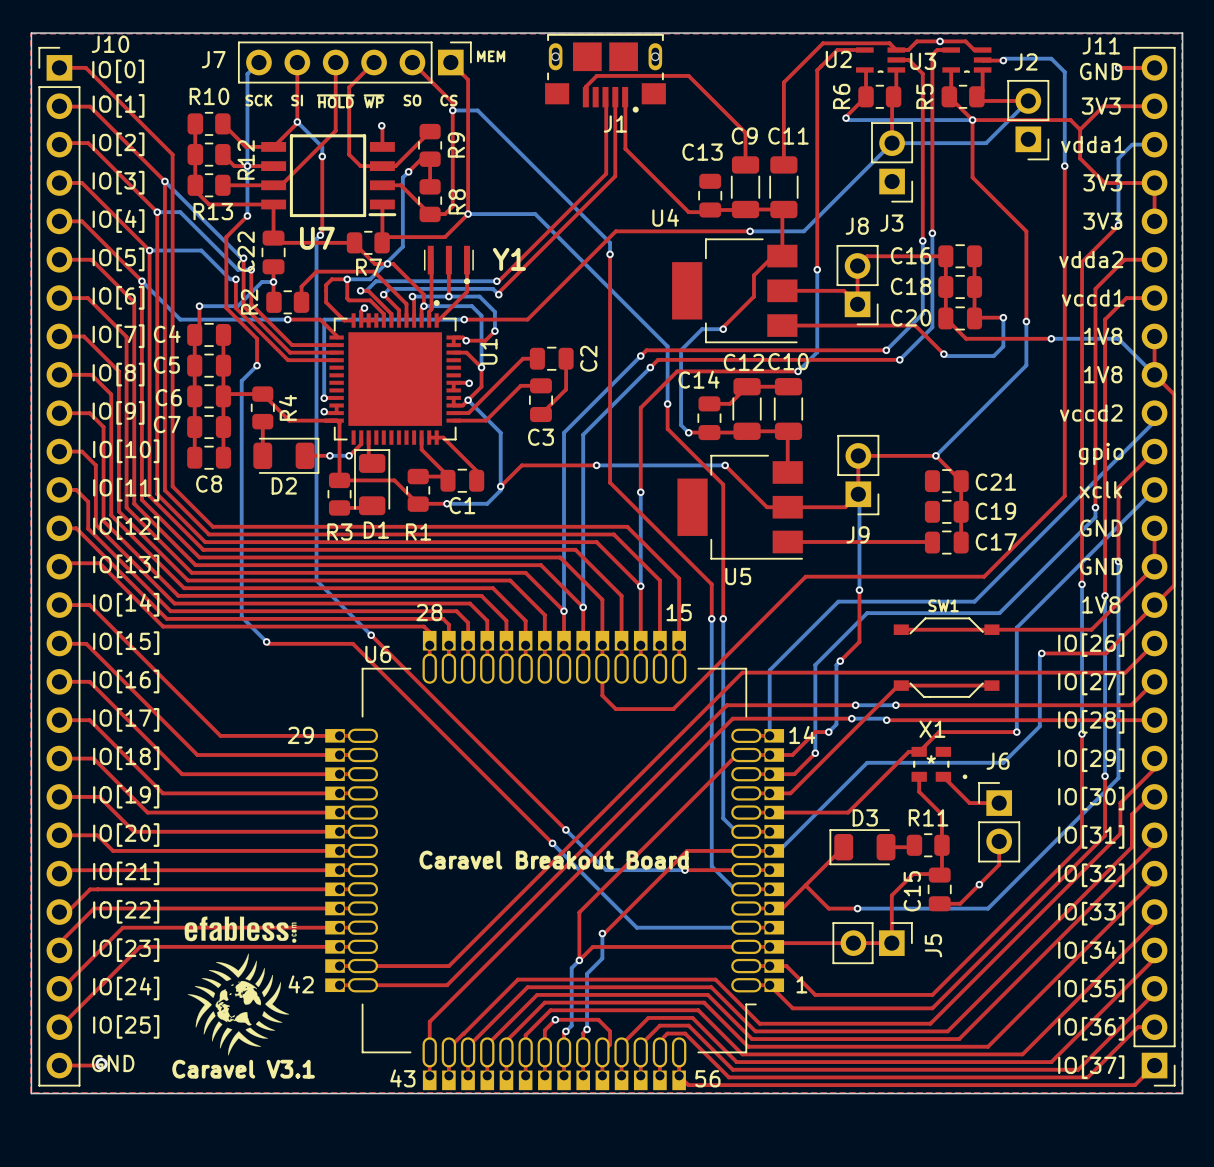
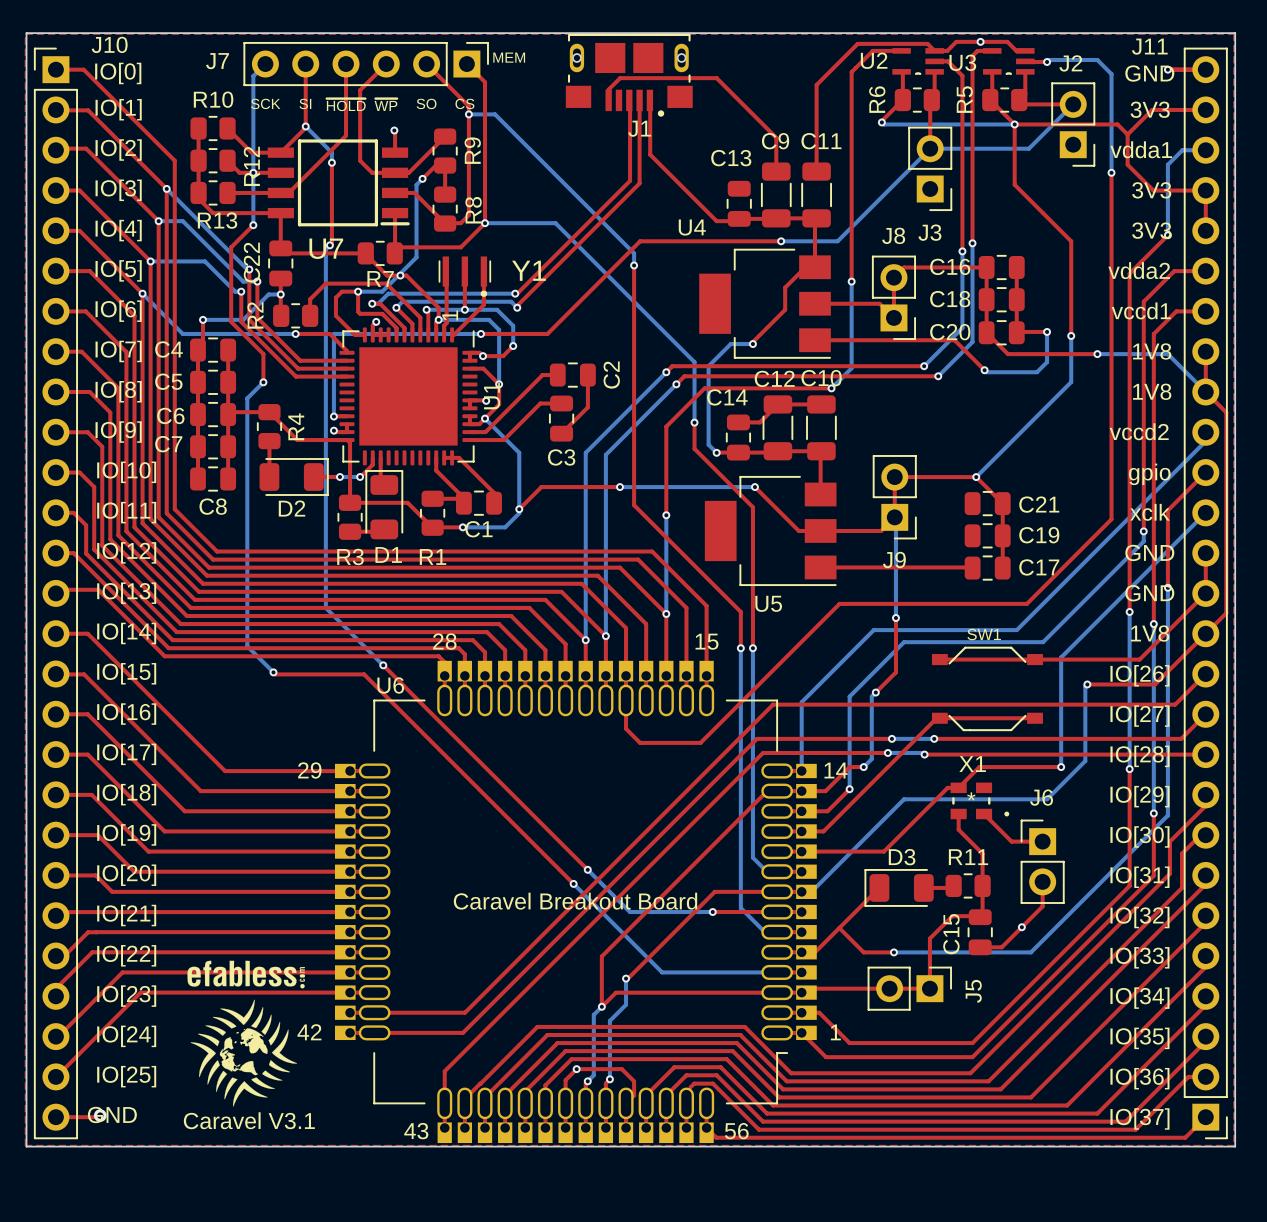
U1 footprint: [329, 299, 461, 445] -> [339, 327, 478, 466]
text: none -> 1 (450, 315)

